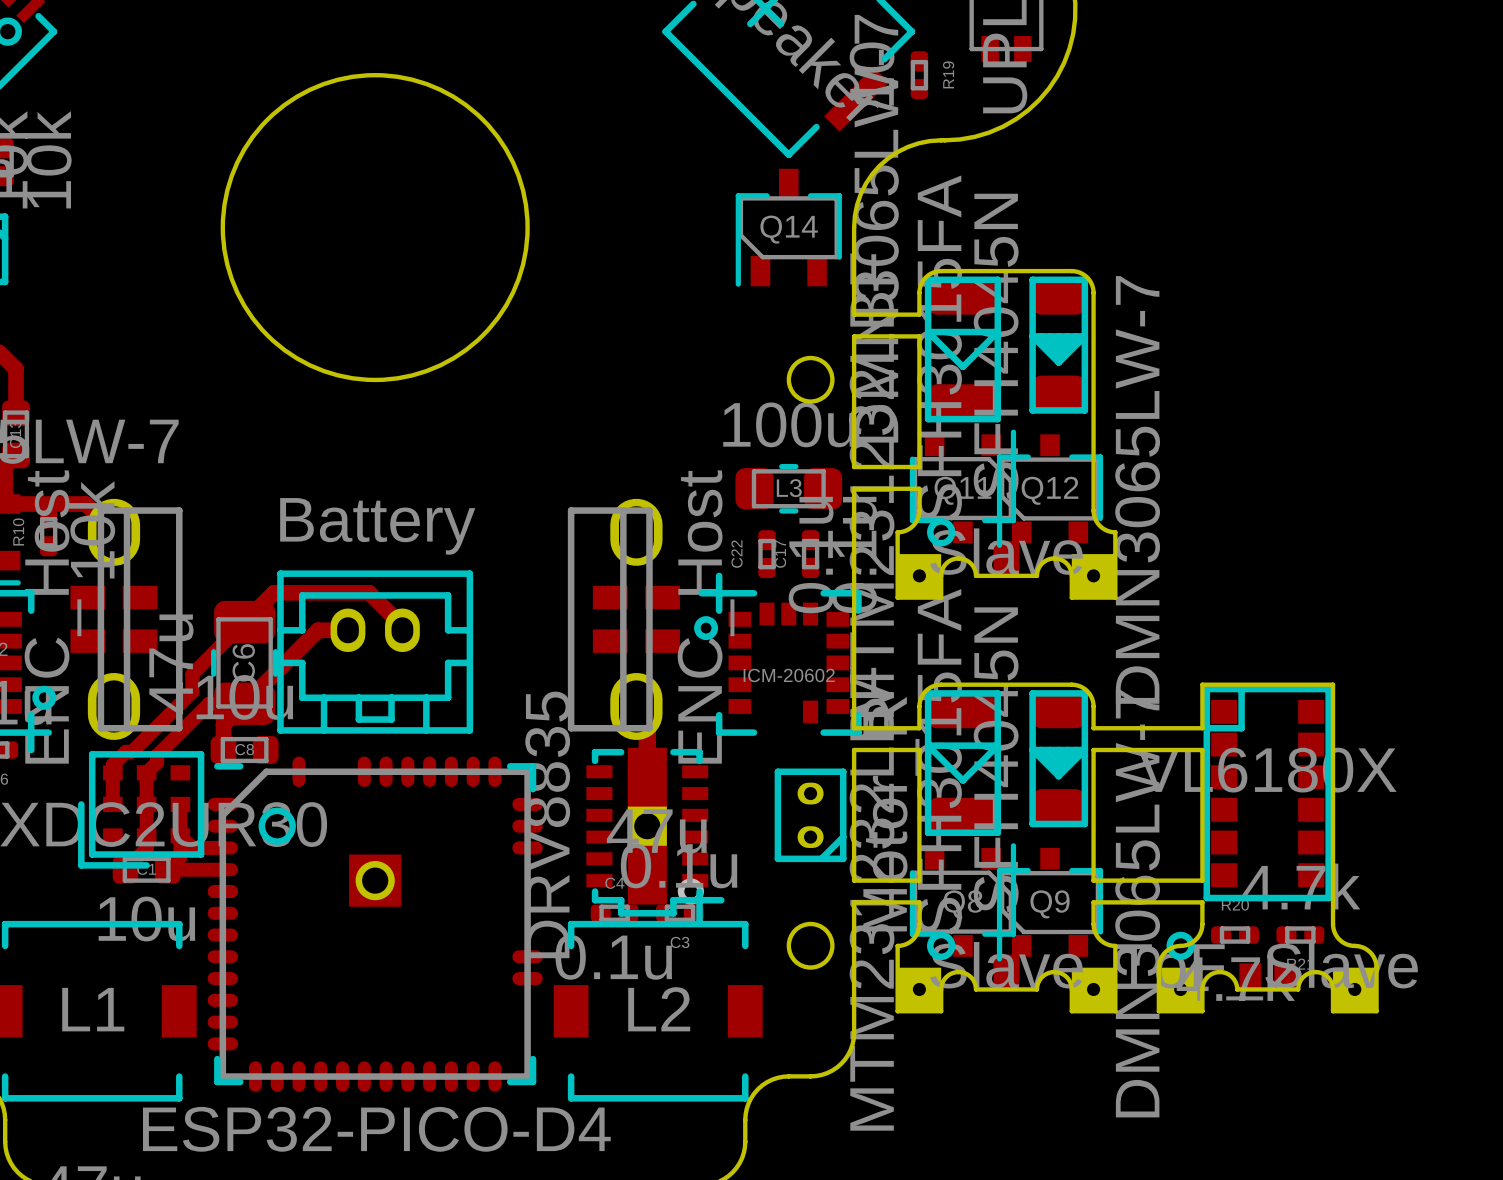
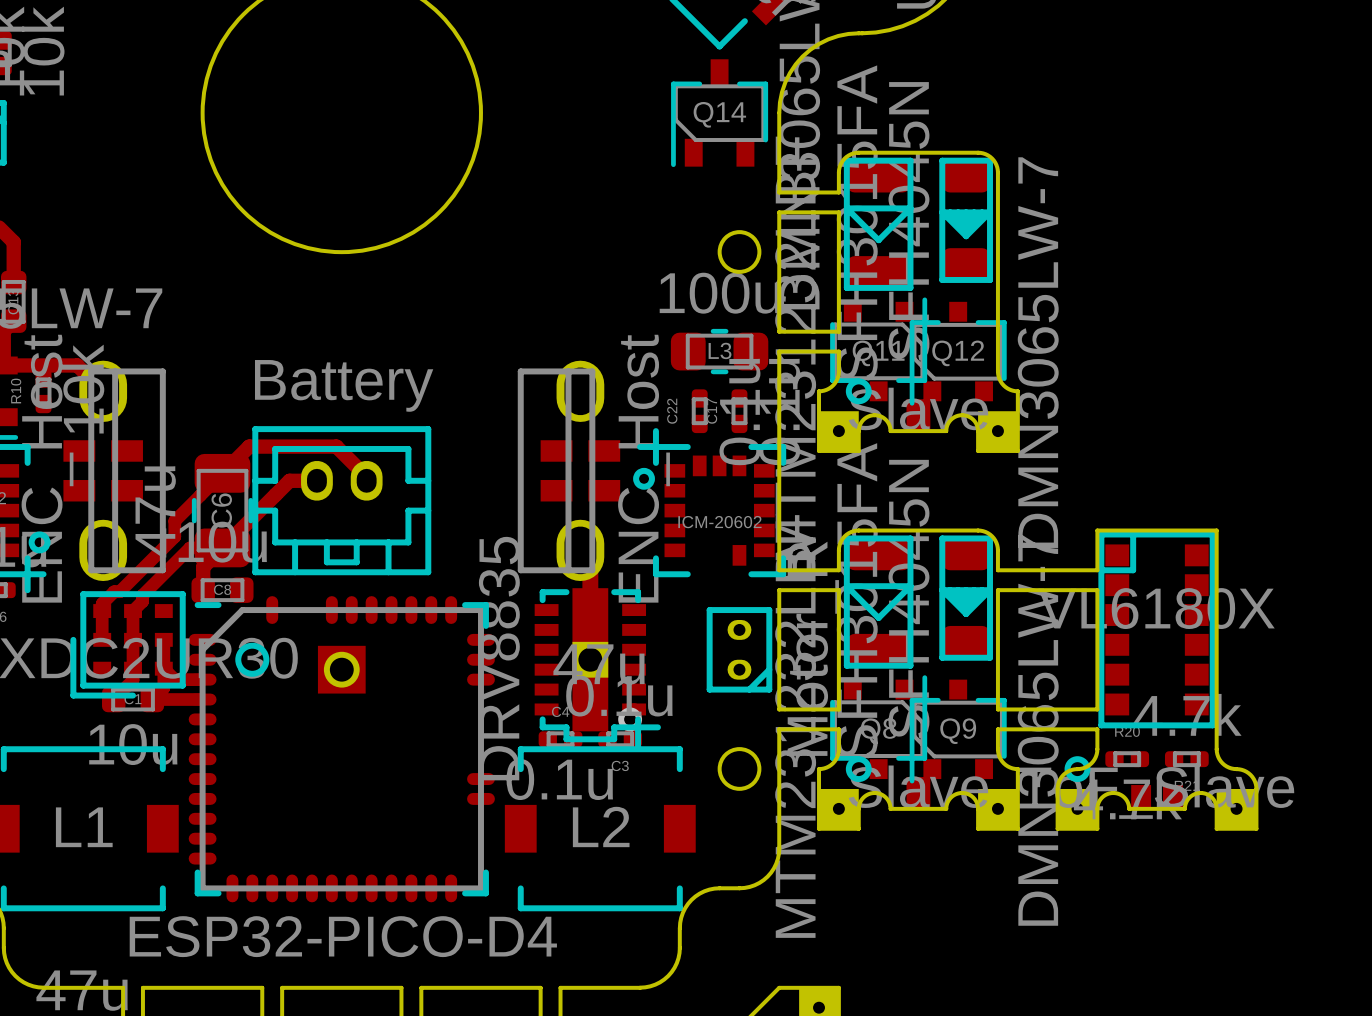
part footprint: [207, 756, 543, 1092] -> [188, 596, 495, 903]

